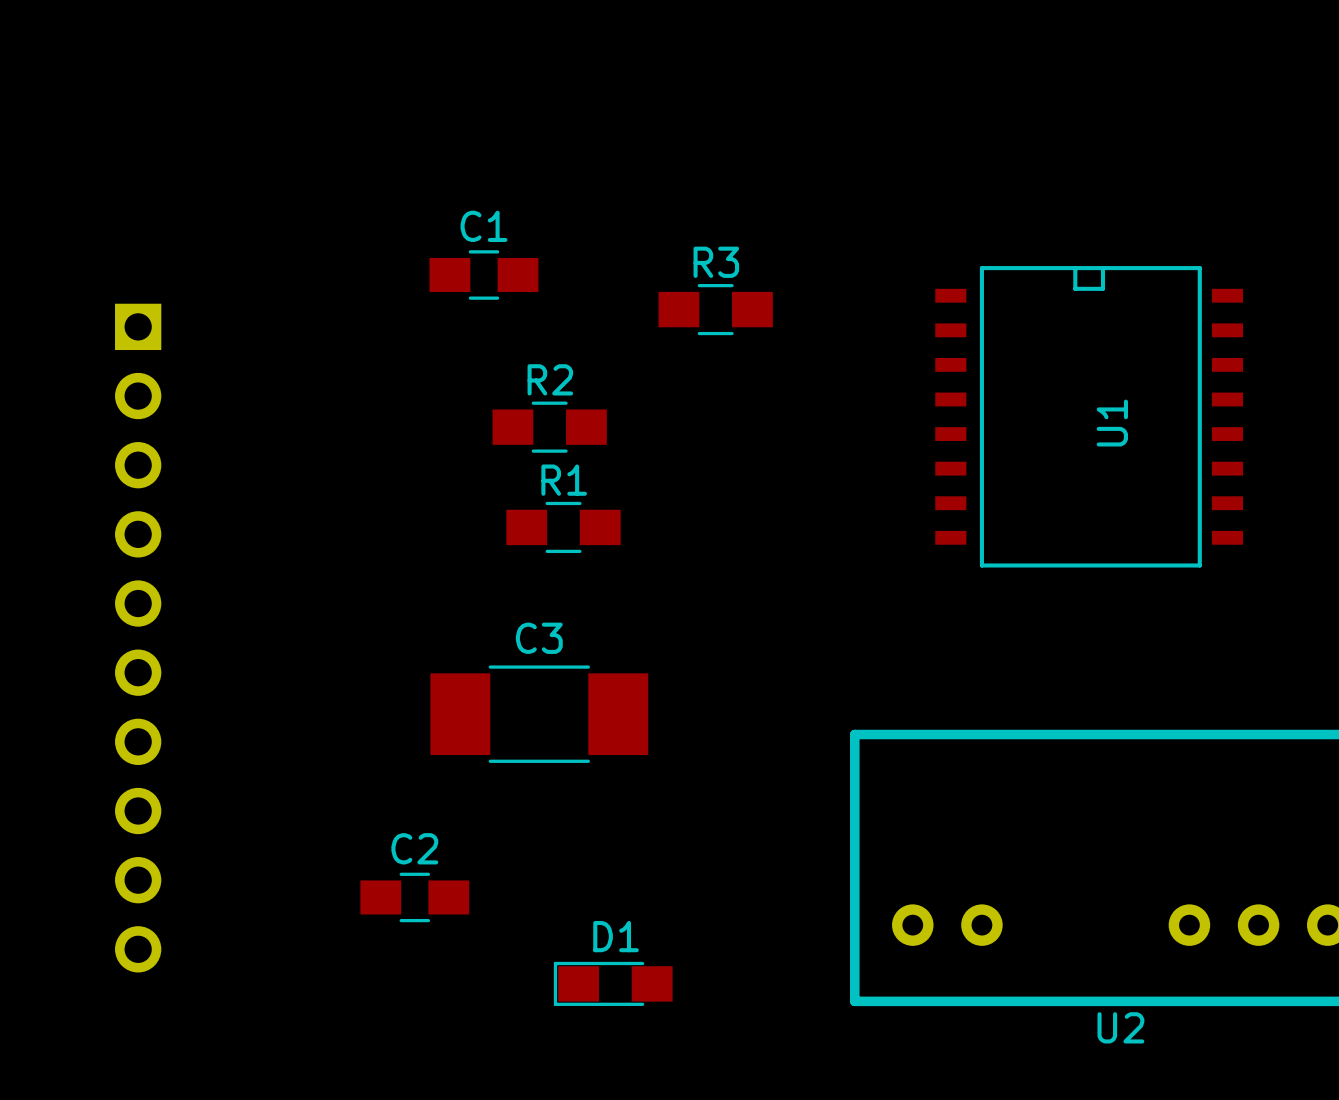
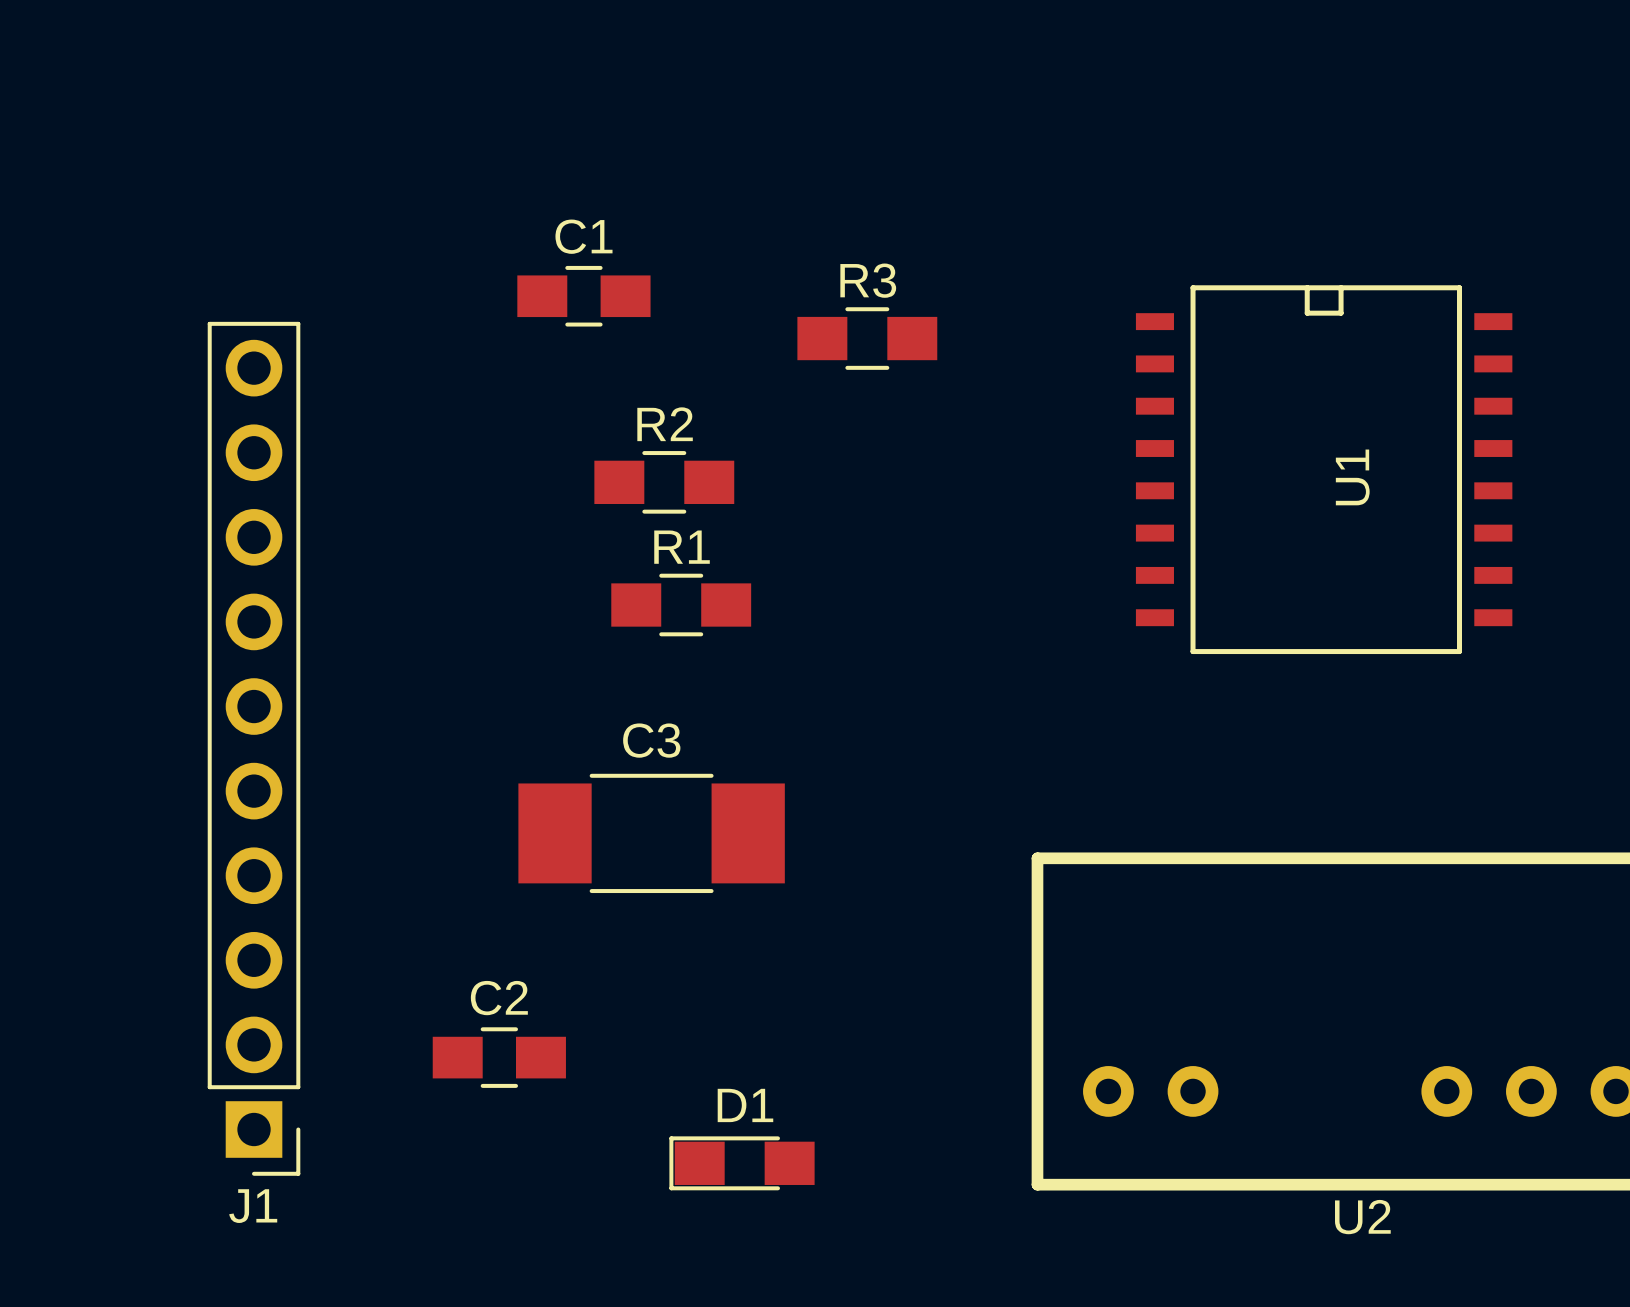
J1 side: bottom (138, 638) -> top (254, 748)

